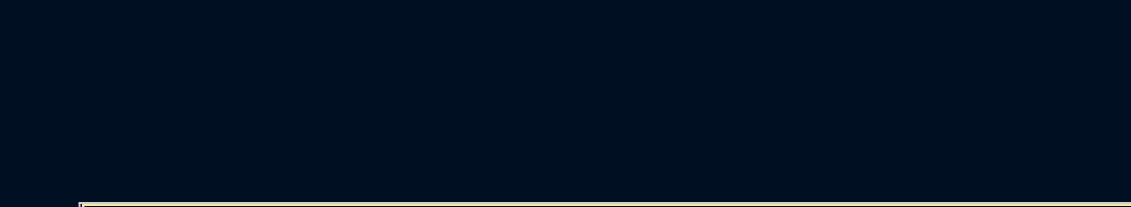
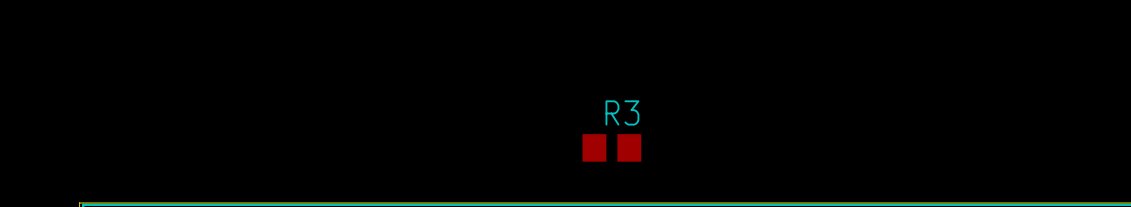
R3: none -> (611, 147)

